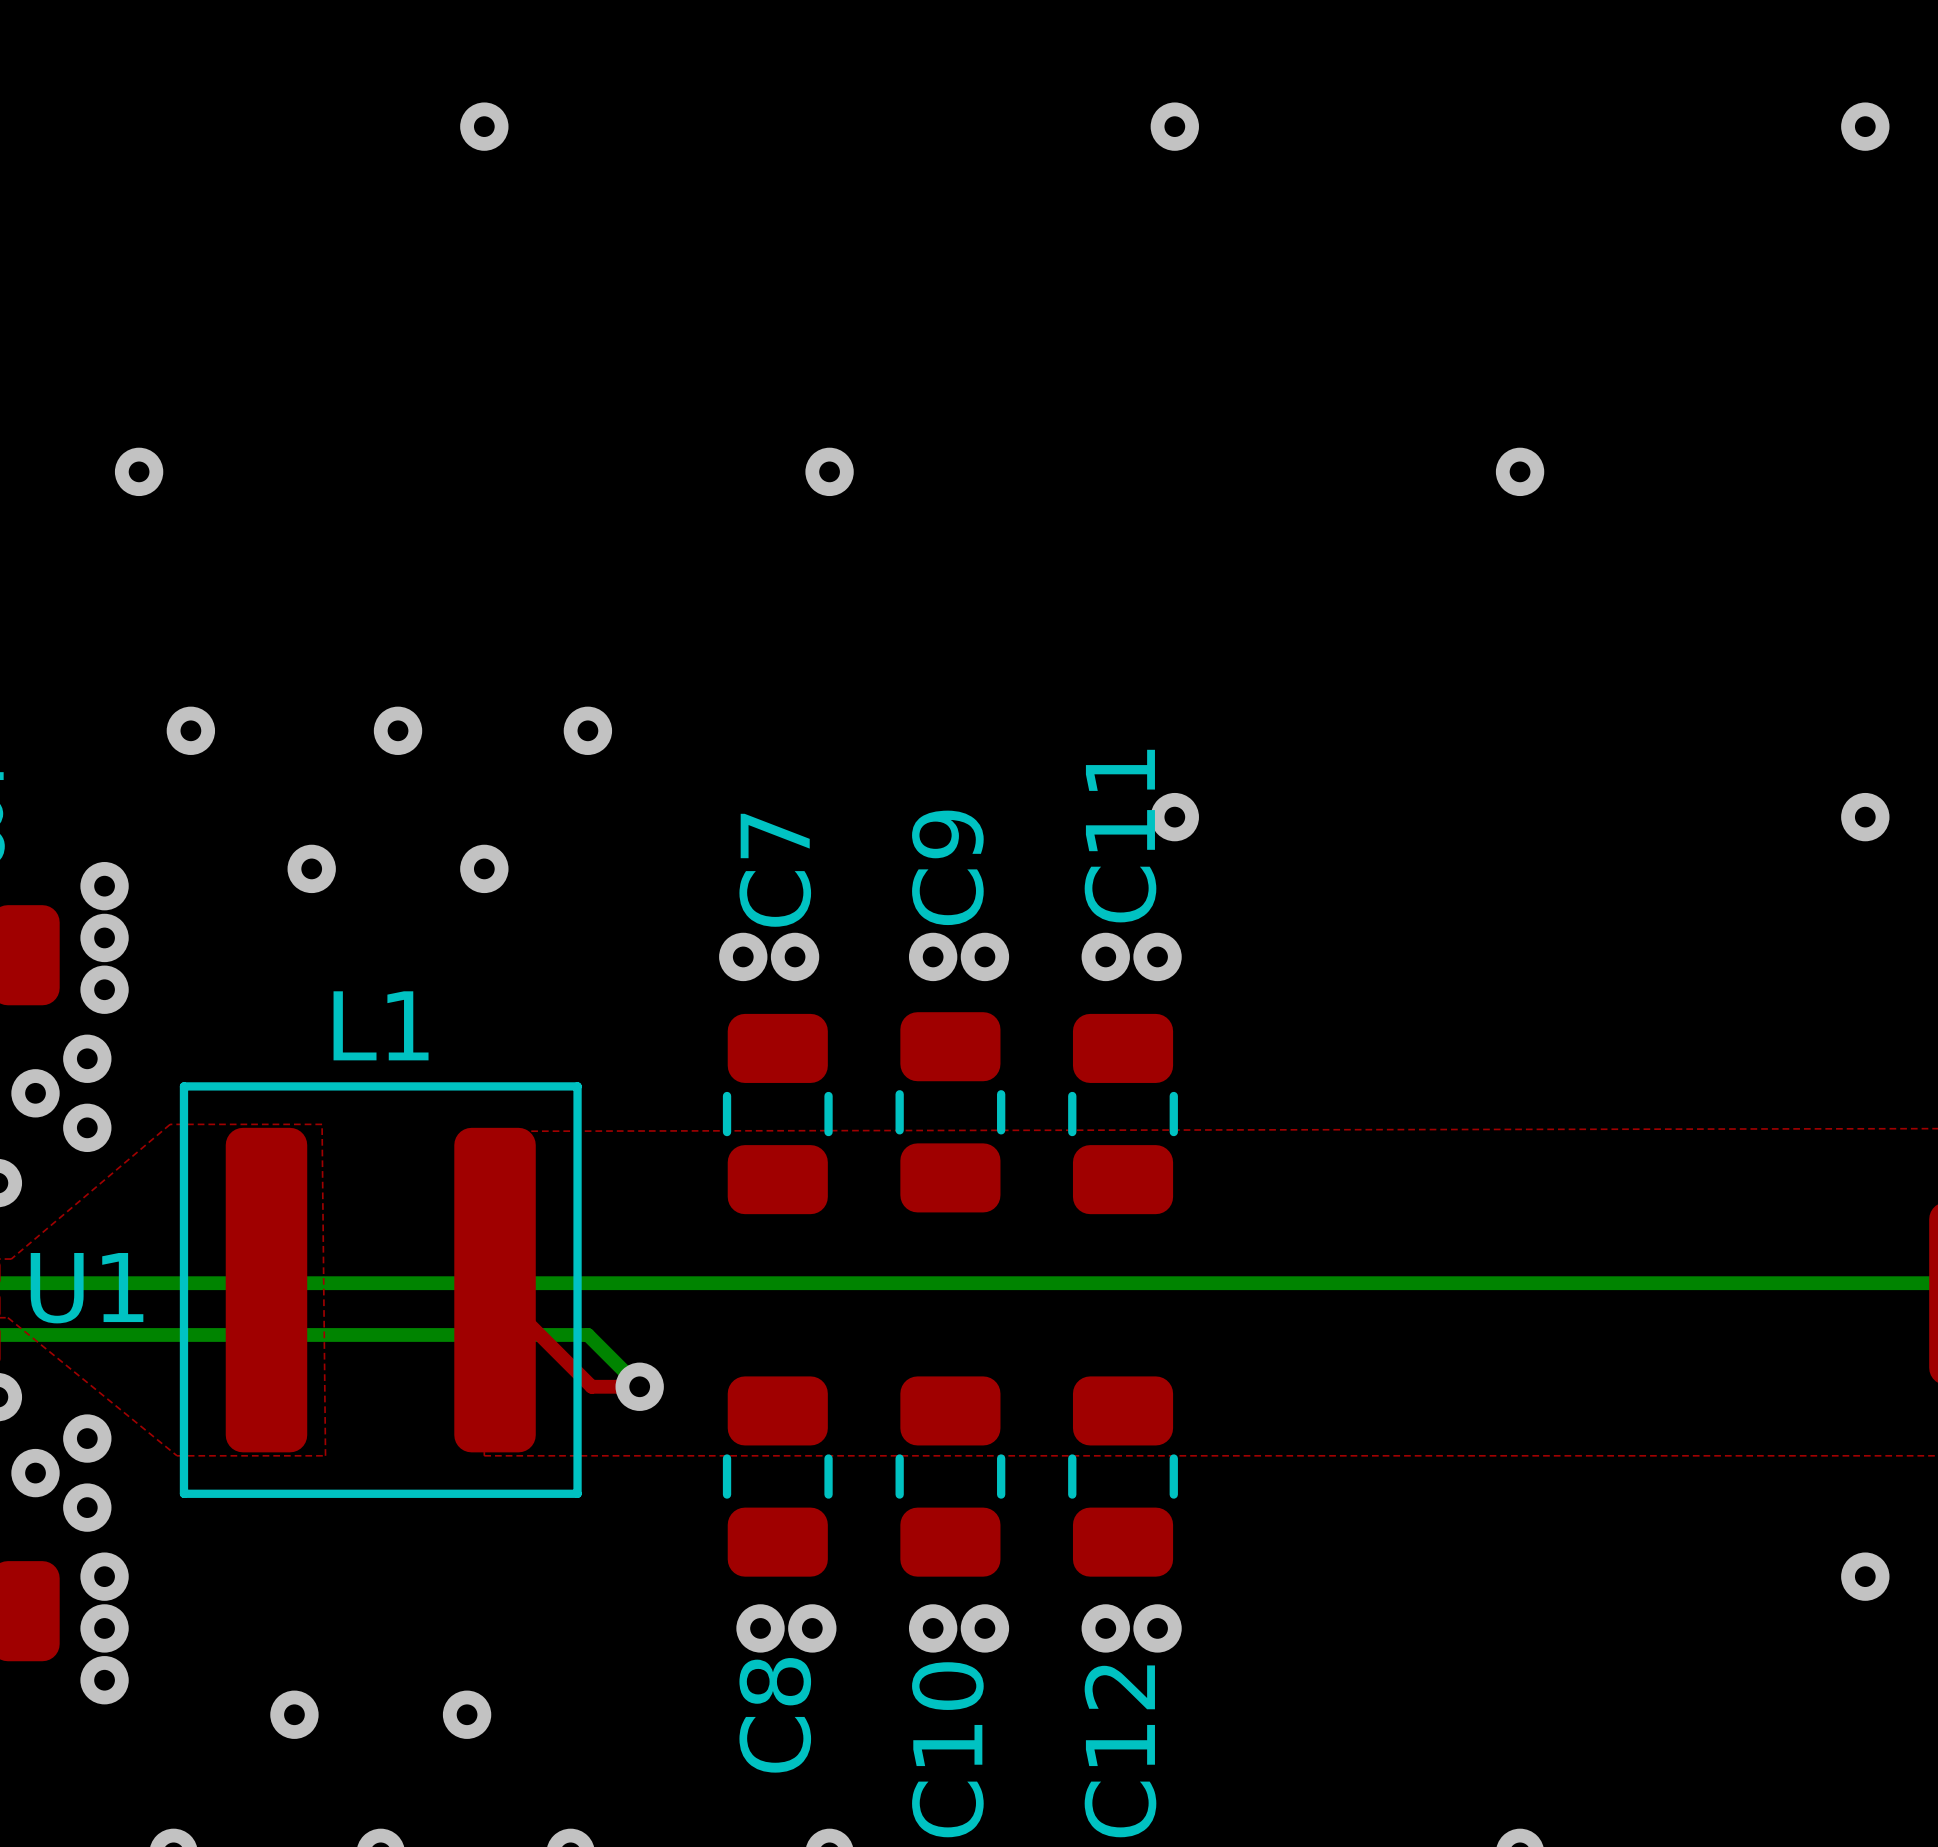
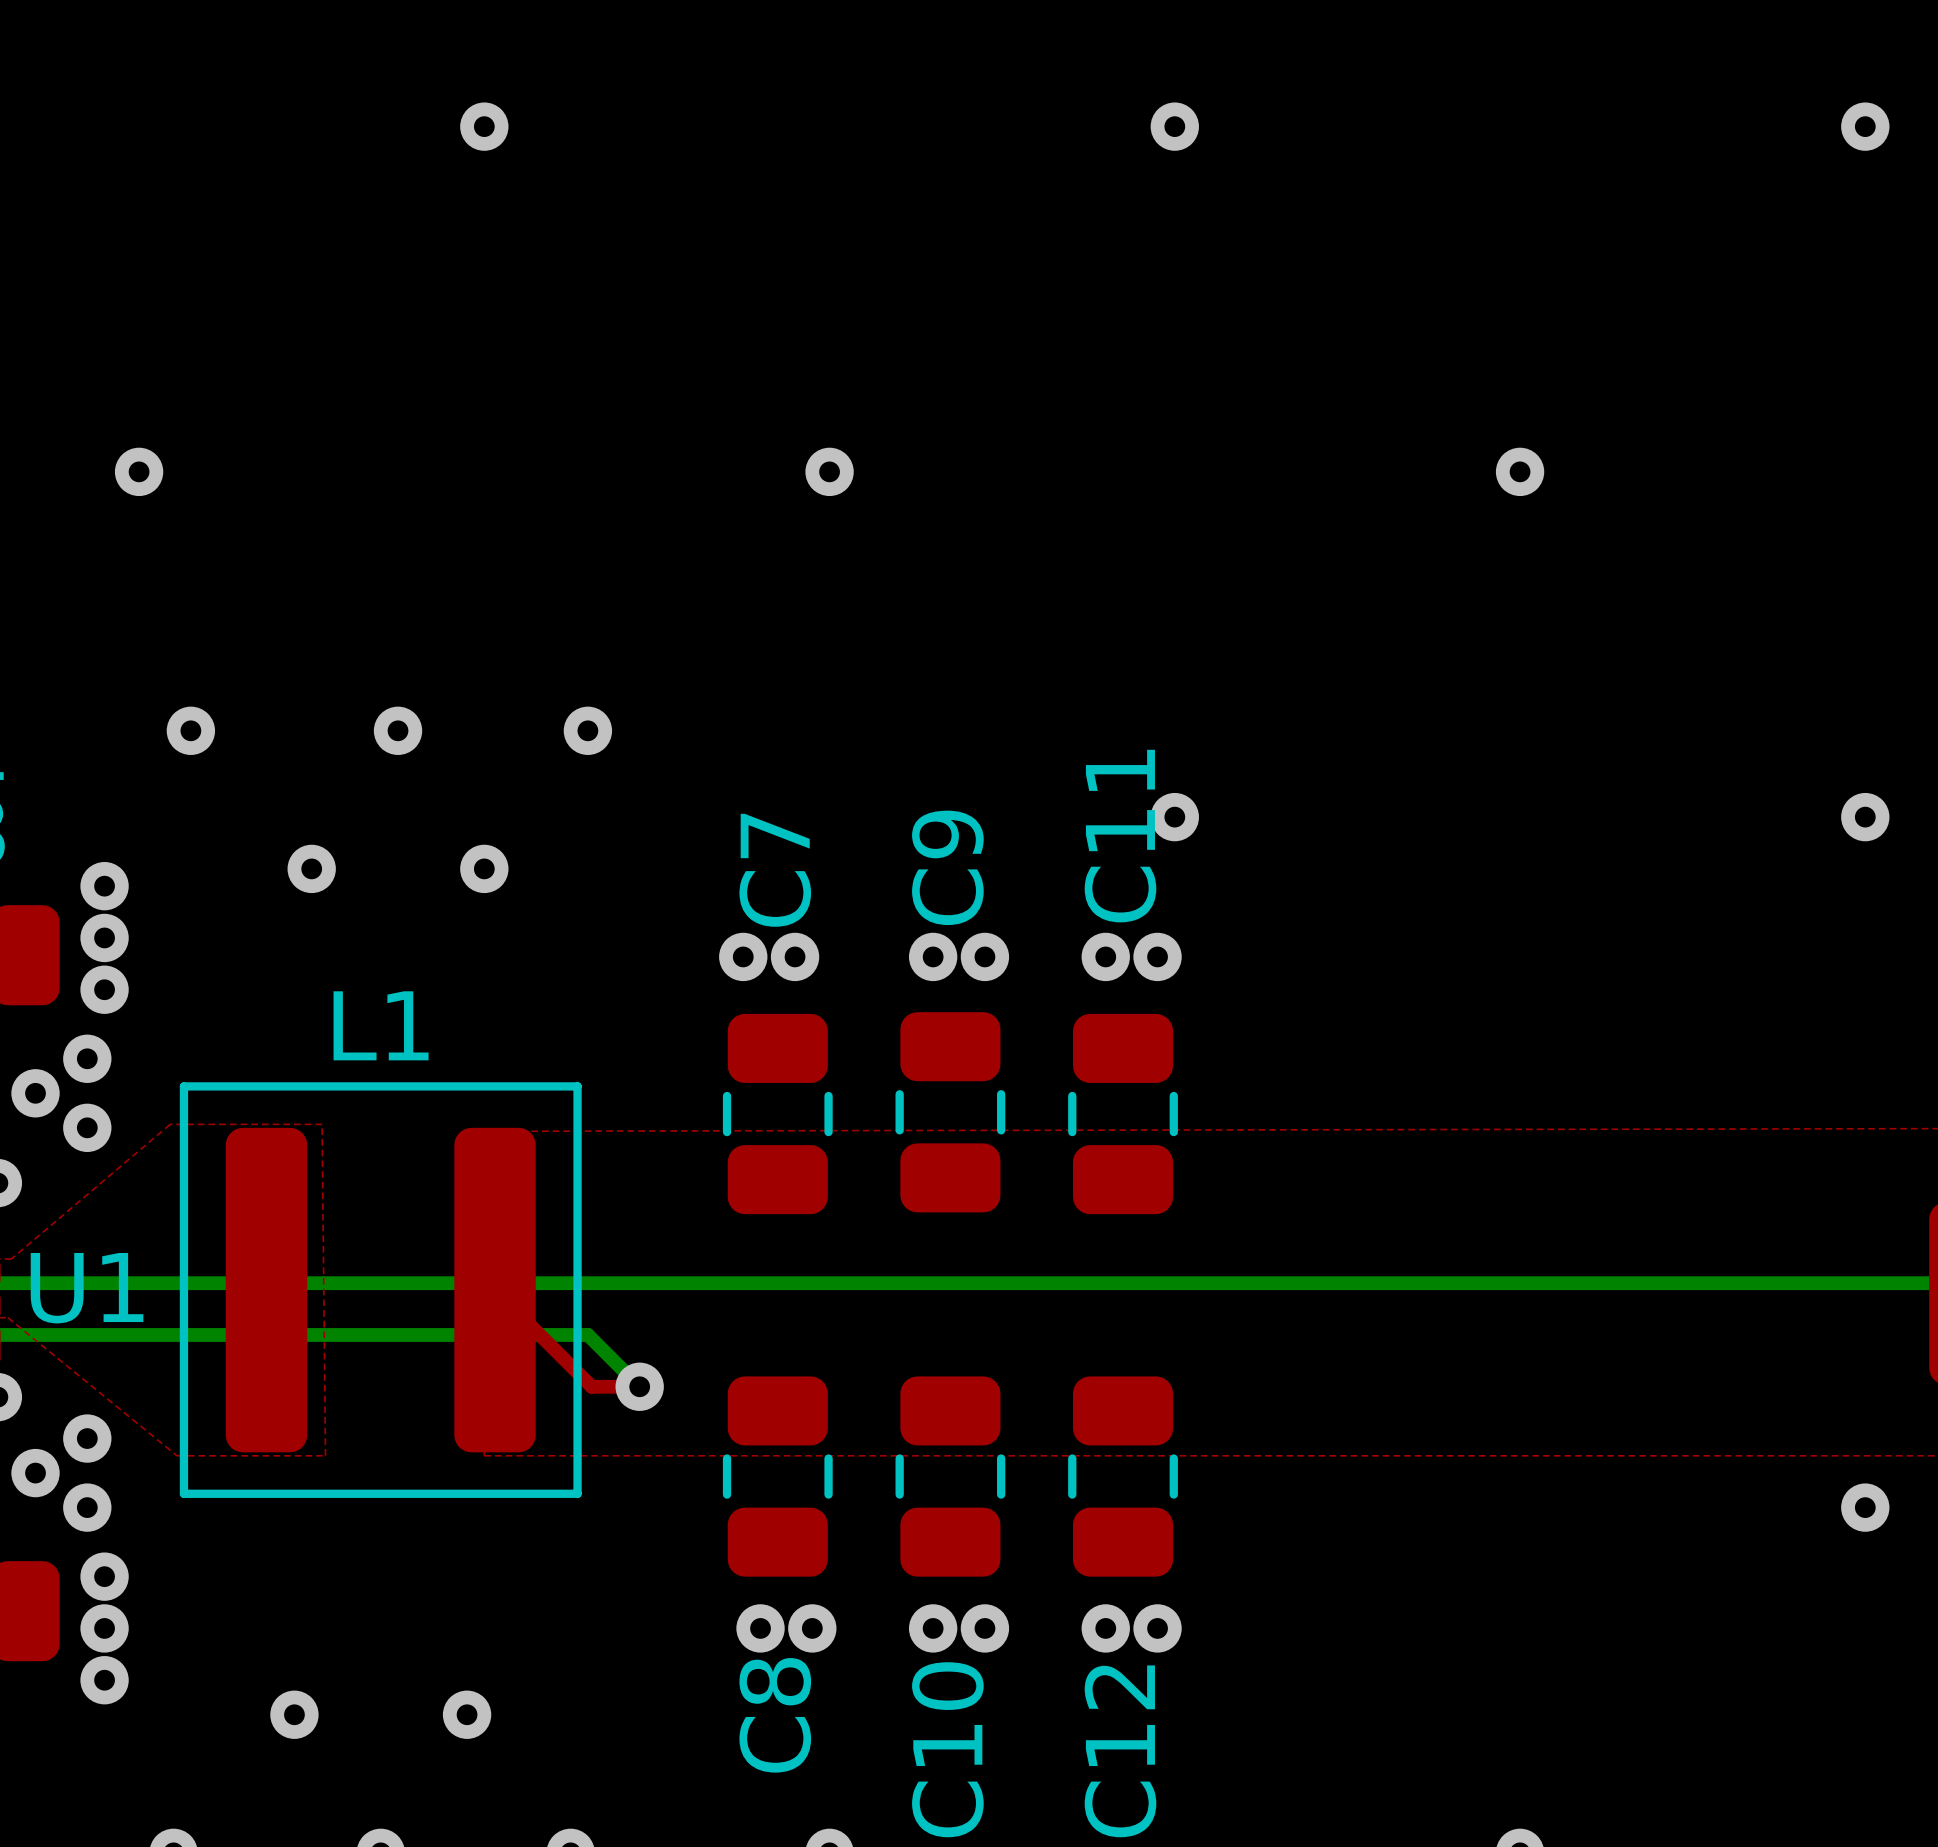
via position: (1865, 1576) -> (1865, 1507)

